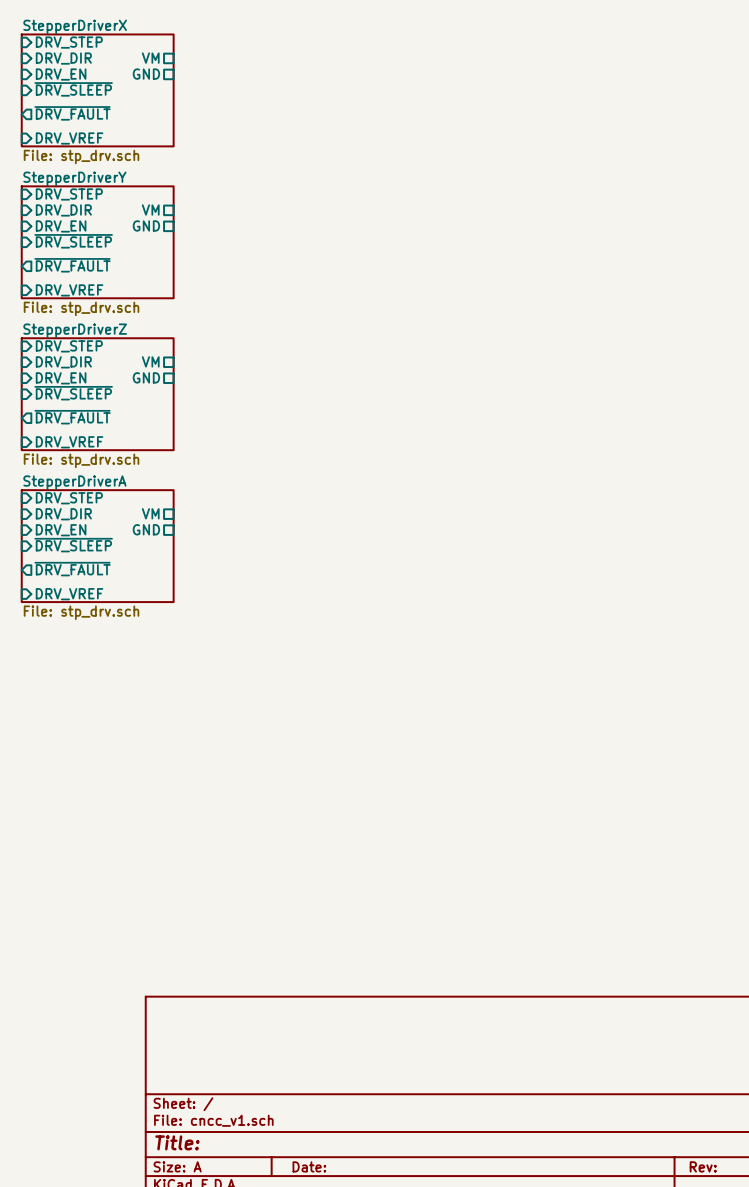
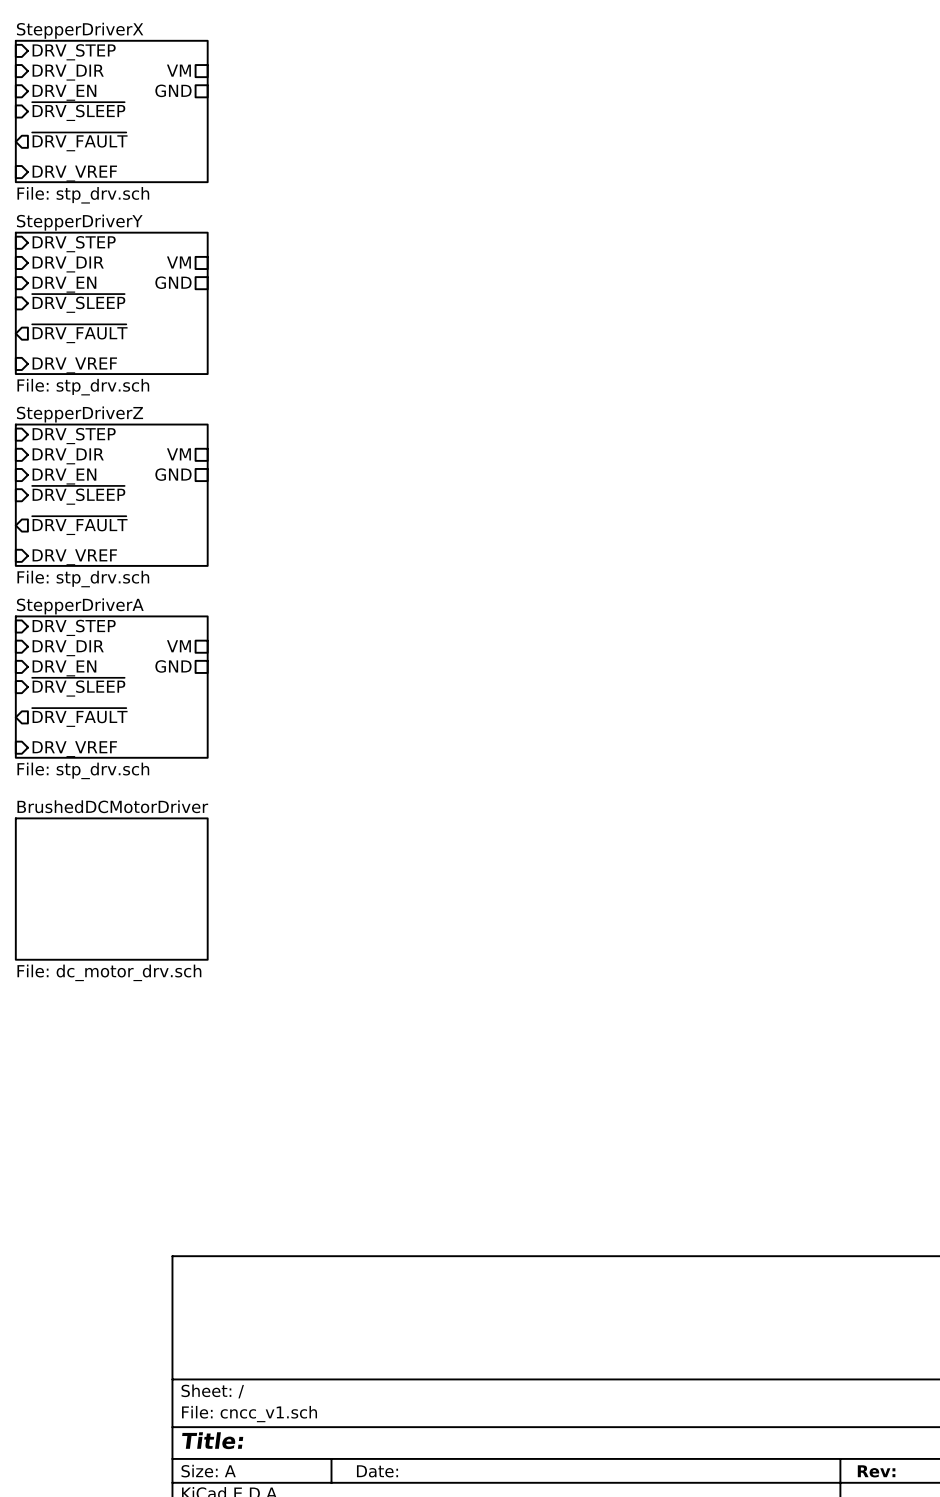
sheet BrushedDCMotorDriver: none -> File: dc_motor_drv.sch (111, 889)

